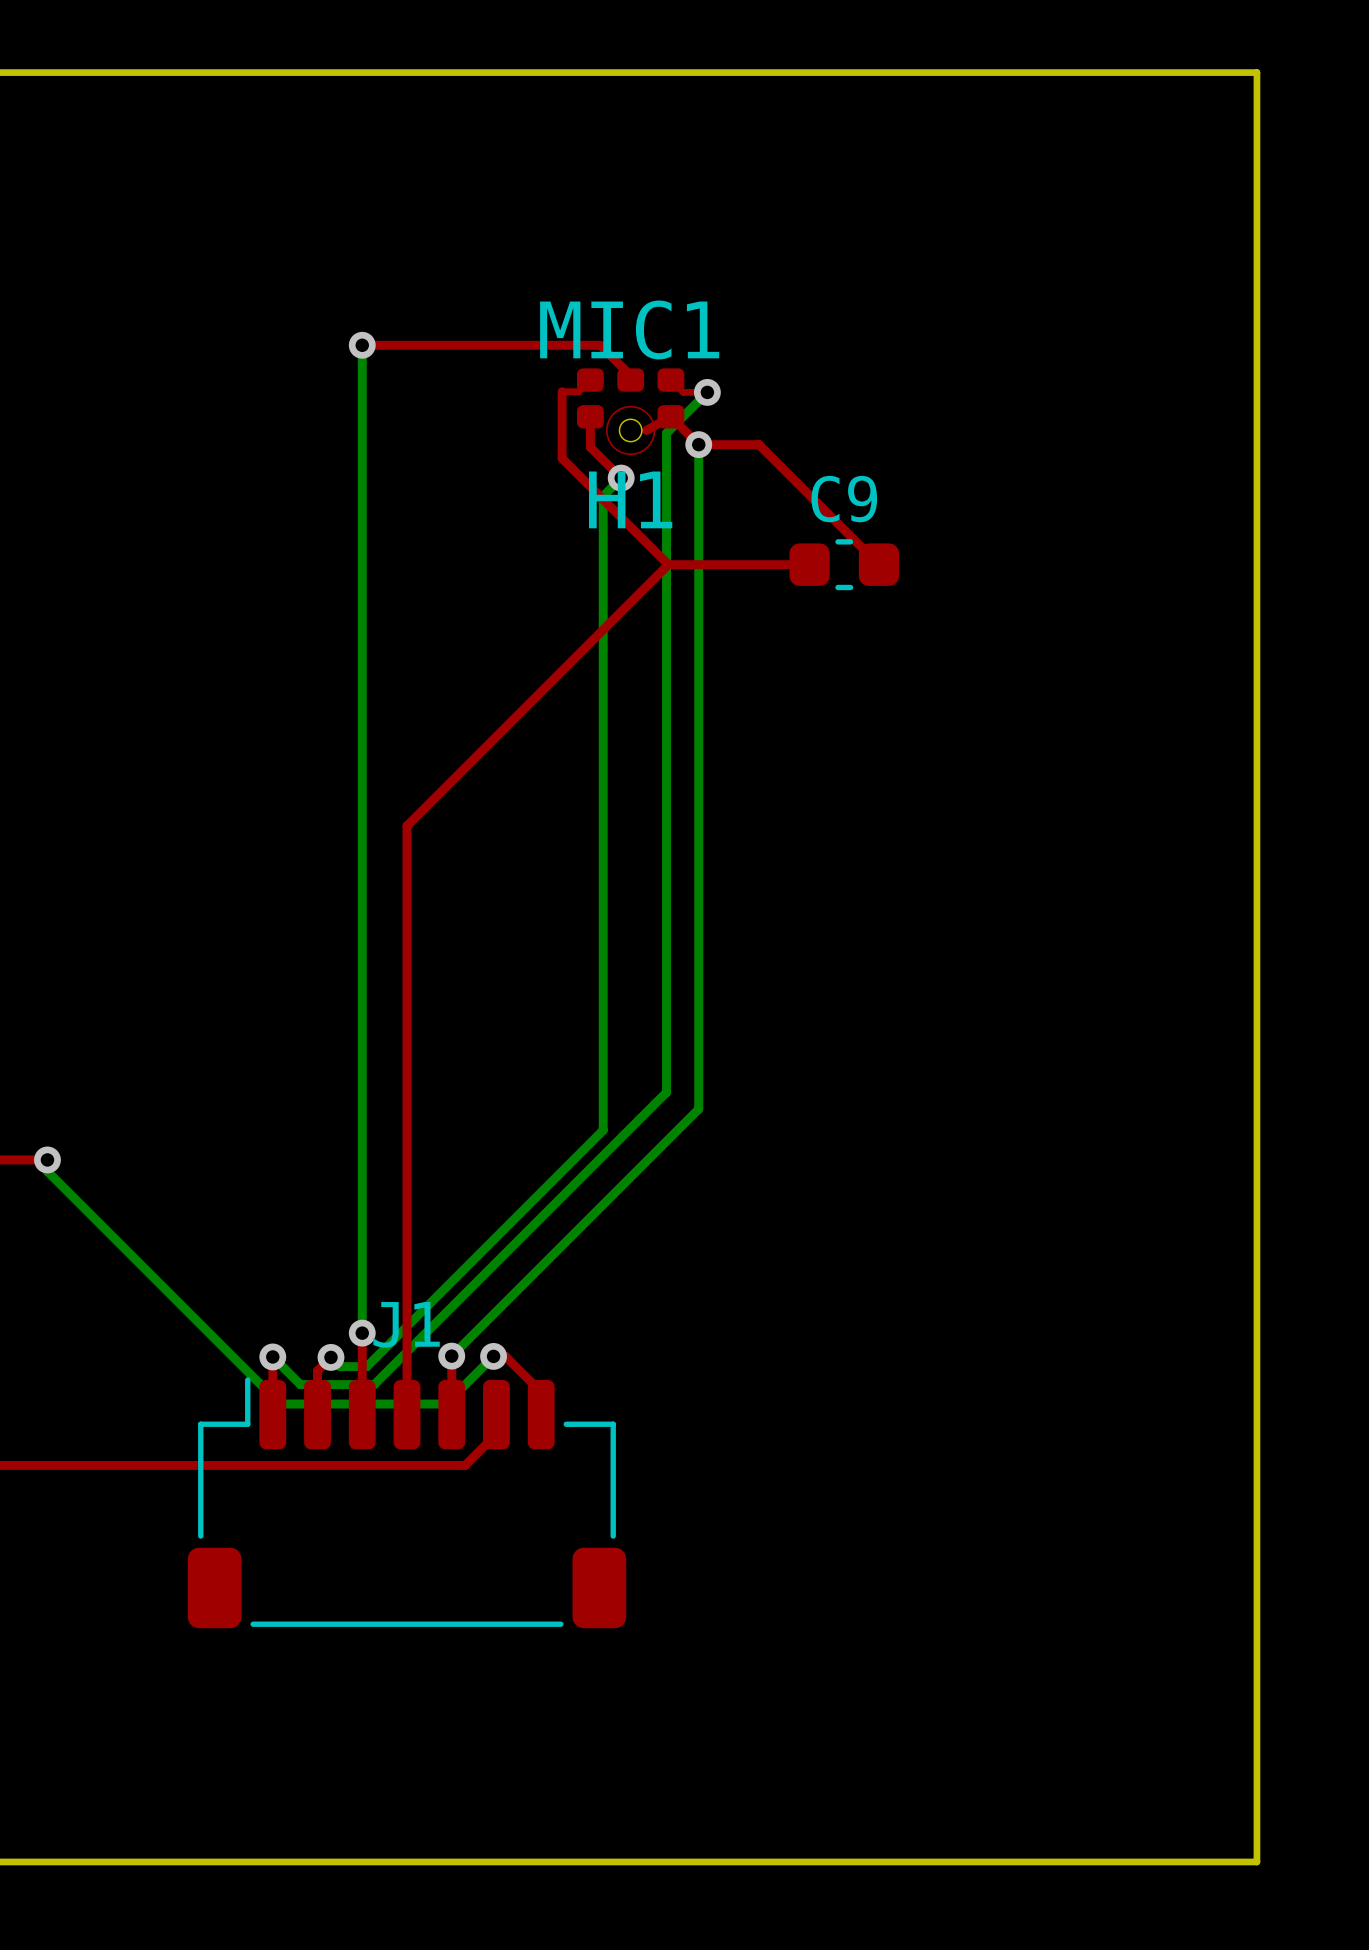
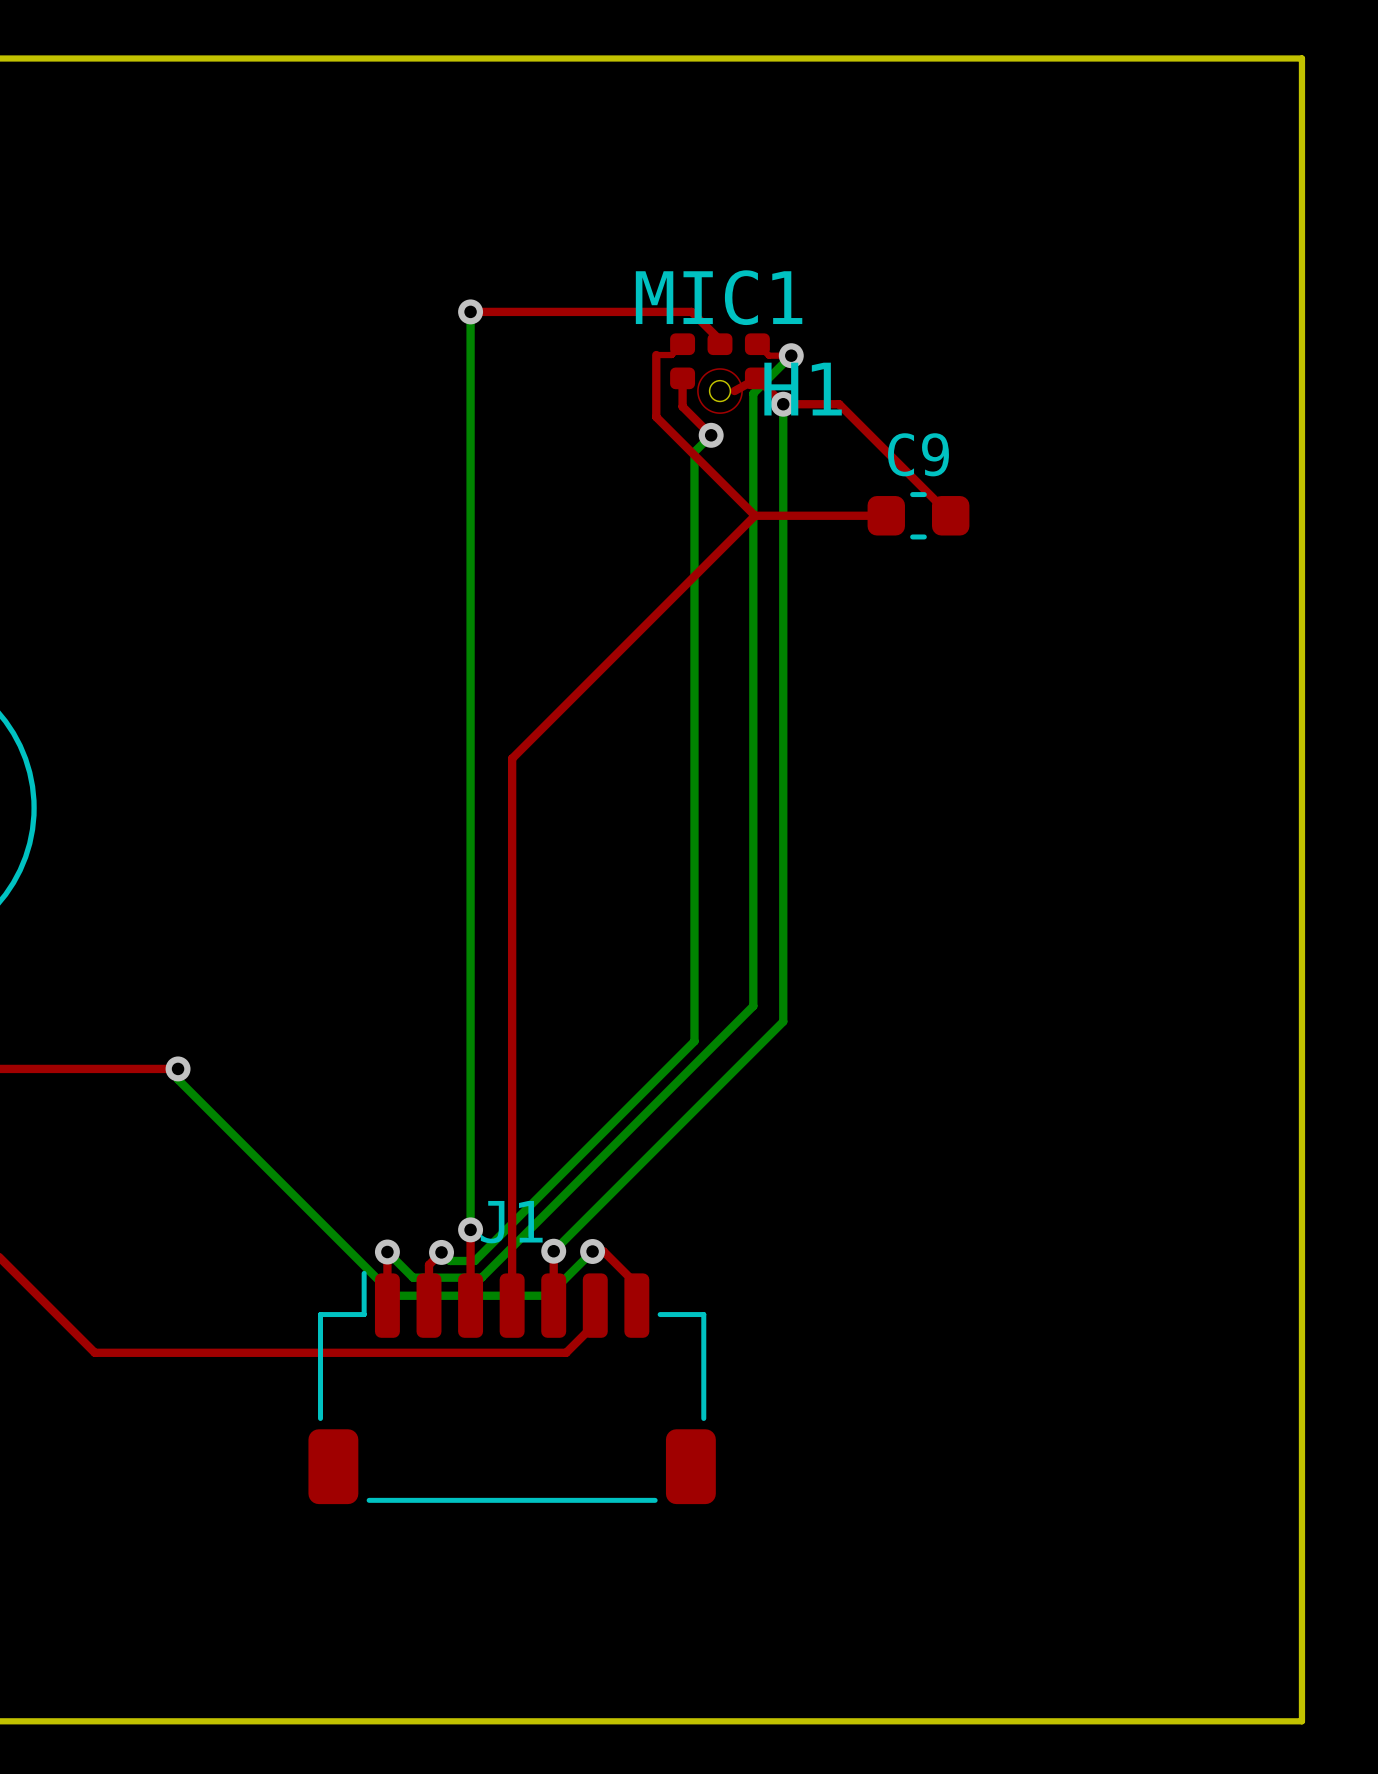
H1 name position: H1 (630, 499) -> H1 (803, 389)

